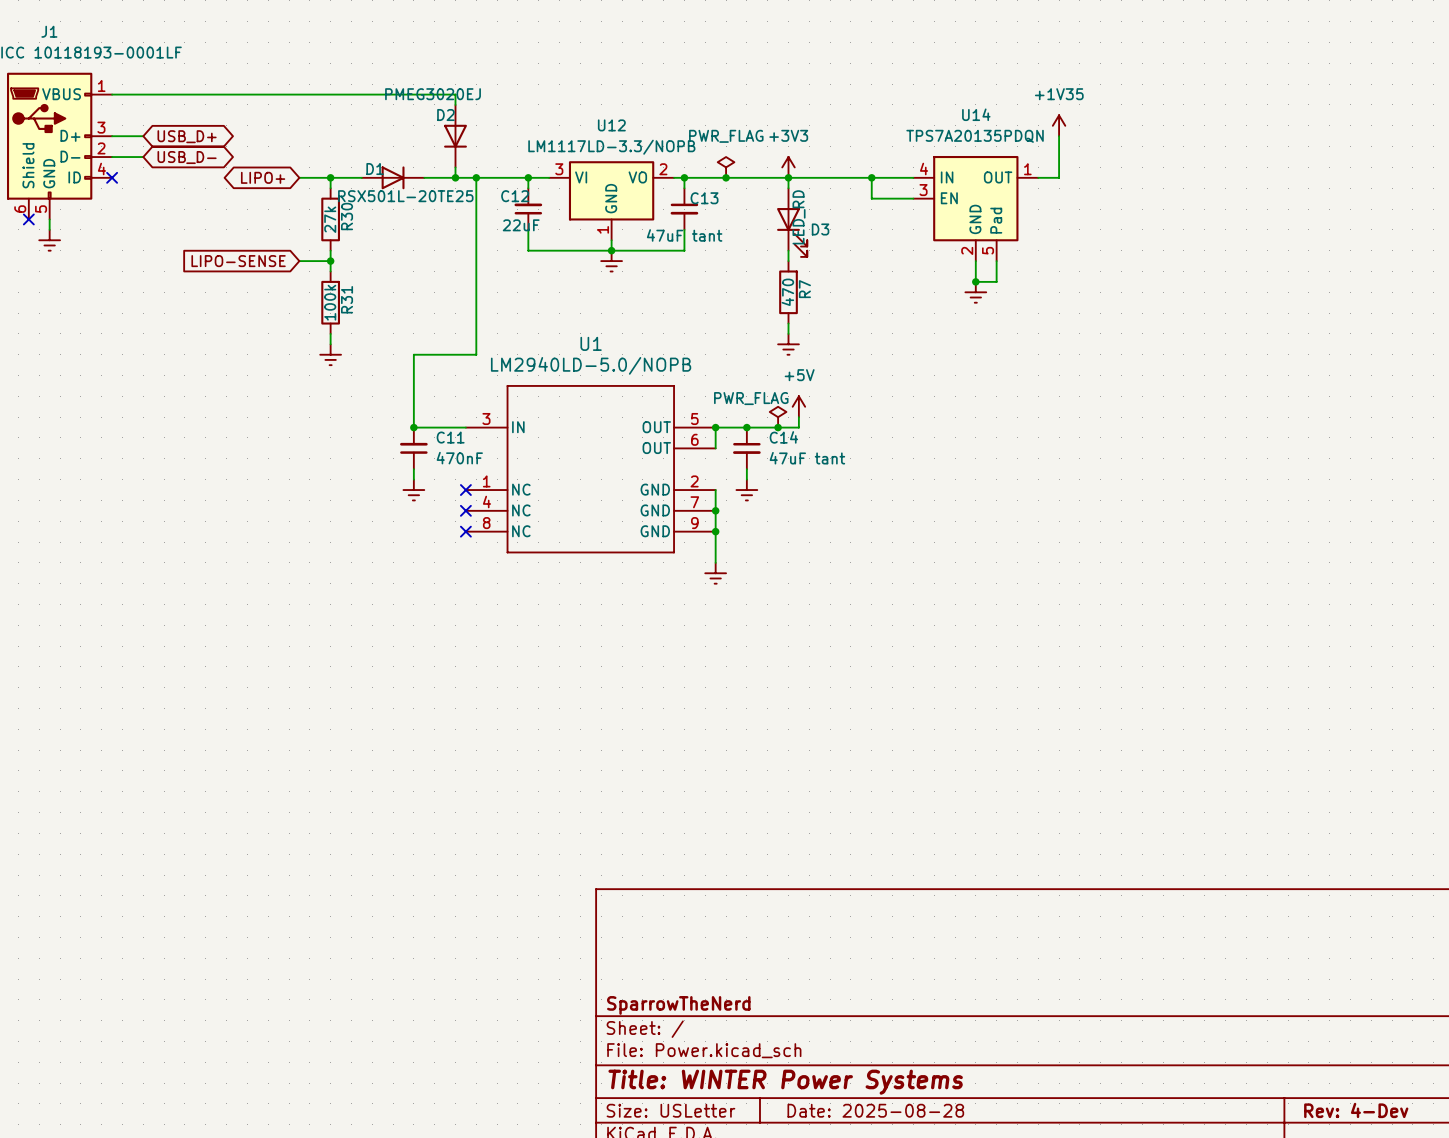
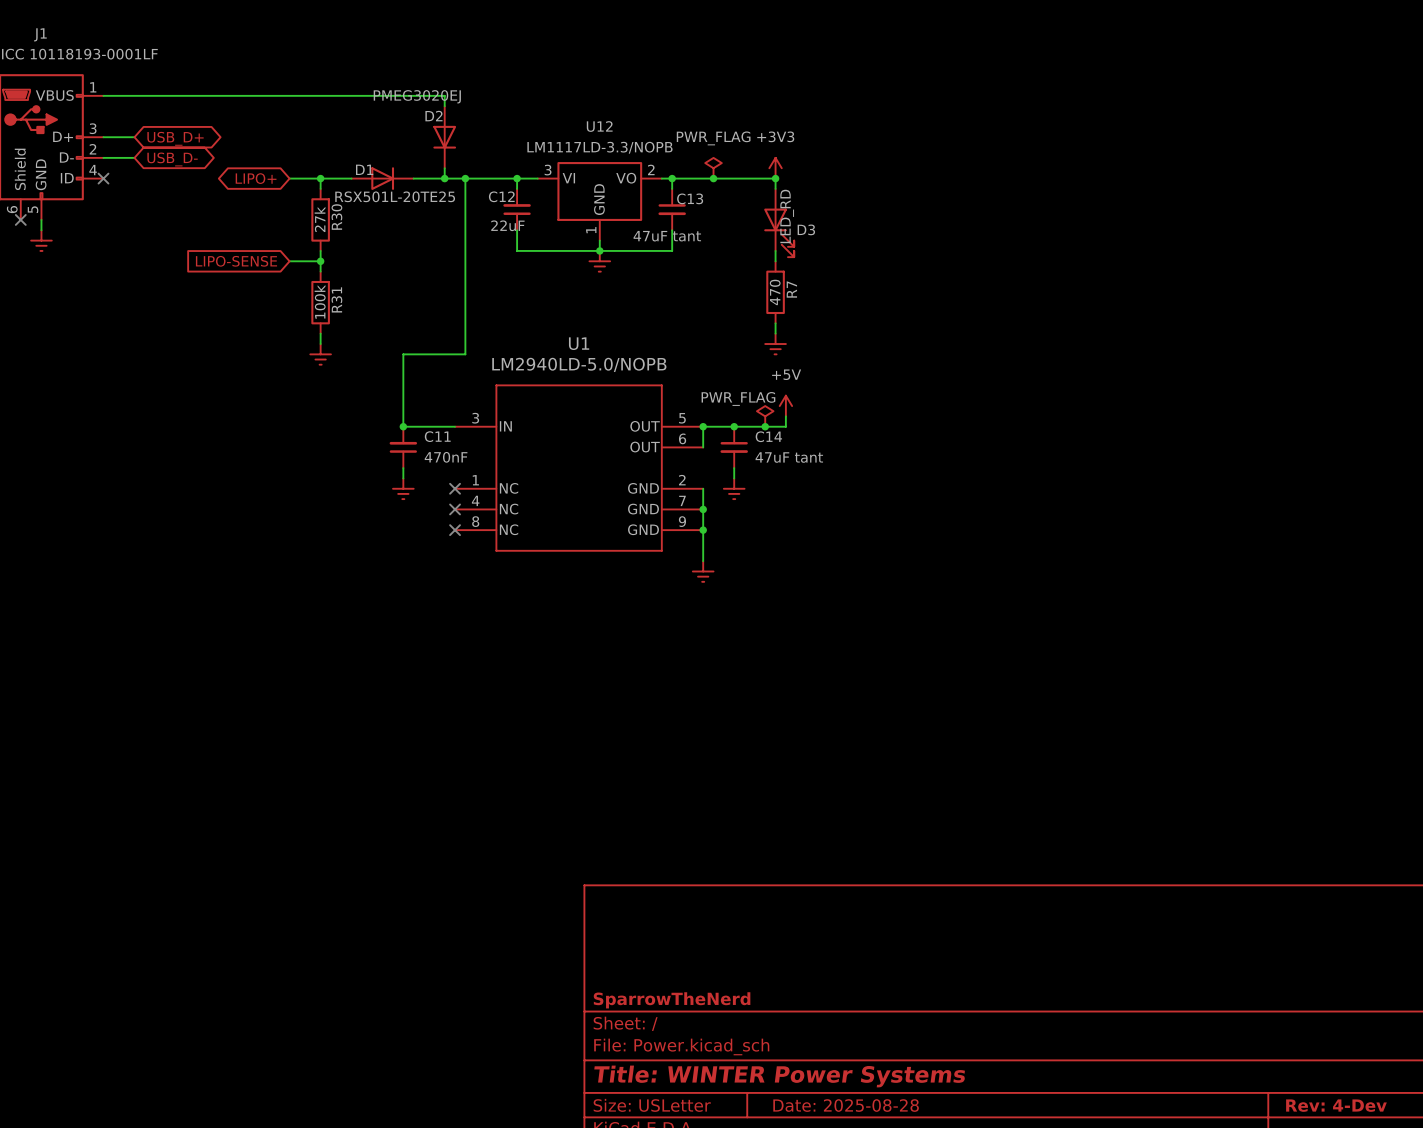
power symbol: +1V35 (1059, 125) -> none
wire: (1059, 136) (1059, 177) (1038, 177) -> none
wire: (788, 177) (913, 177) -> none
wire: (871, 177) (871, 198) (913, 198) -> none
junction: (871, 177) -> none
U14: TPS7A20135PDQN (975, 208) -> none
wire: (975, 261) (975, 281) (996, 281) (996, 261) -> none
junction: (975, 281) -> none
power symbol: (975, 292) -> none

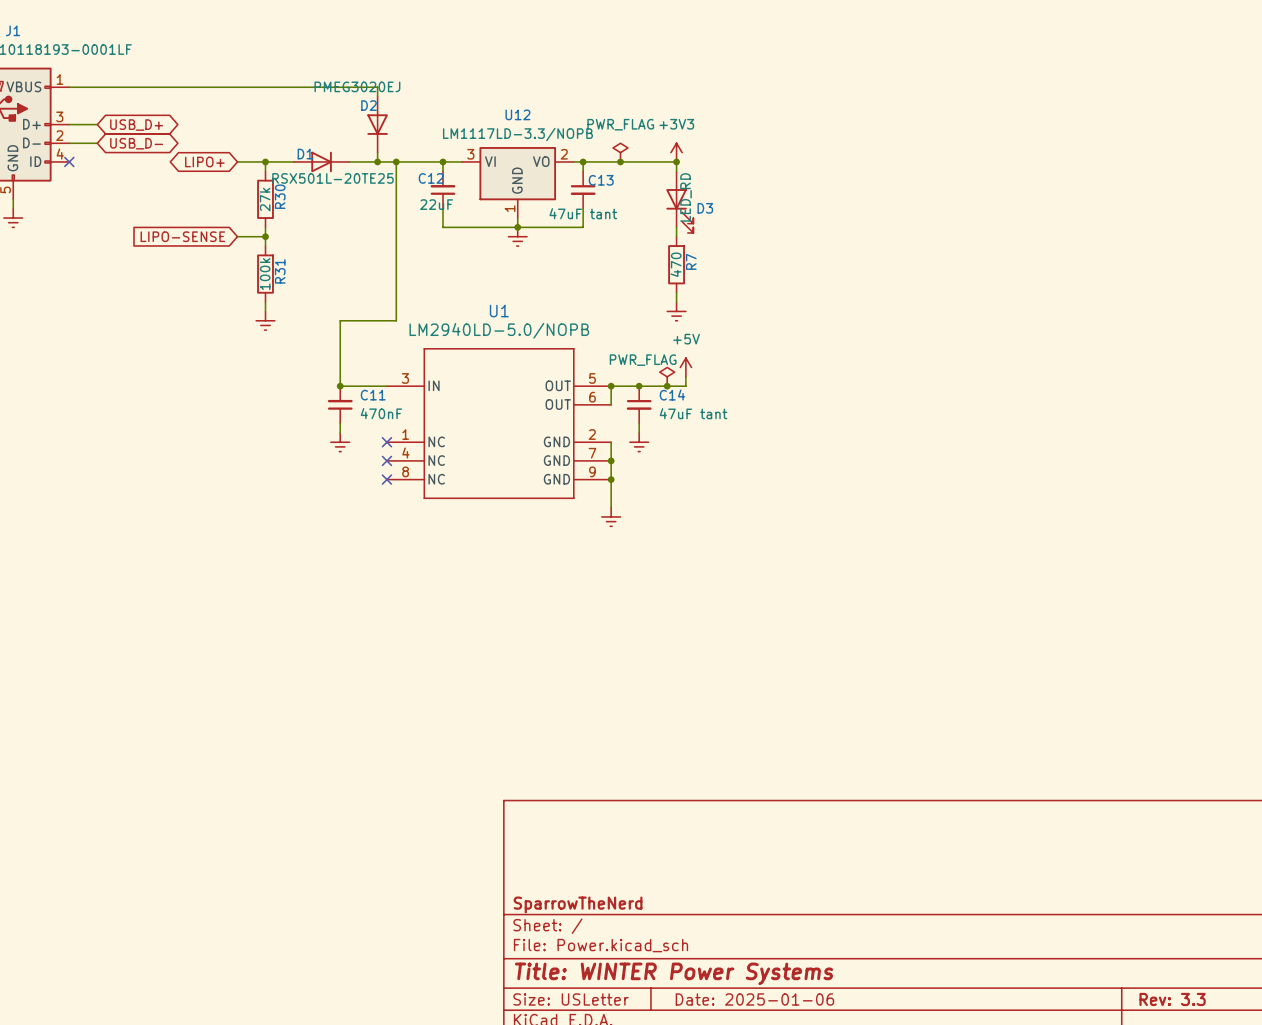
title block: Date: 2025-08-28 (846, 1105) -> Date: 2025-01-06 (754, 999)
title block: Rev: 4-Dev (1336, 1105) -> Rev: 3.3 (1172, 999)

